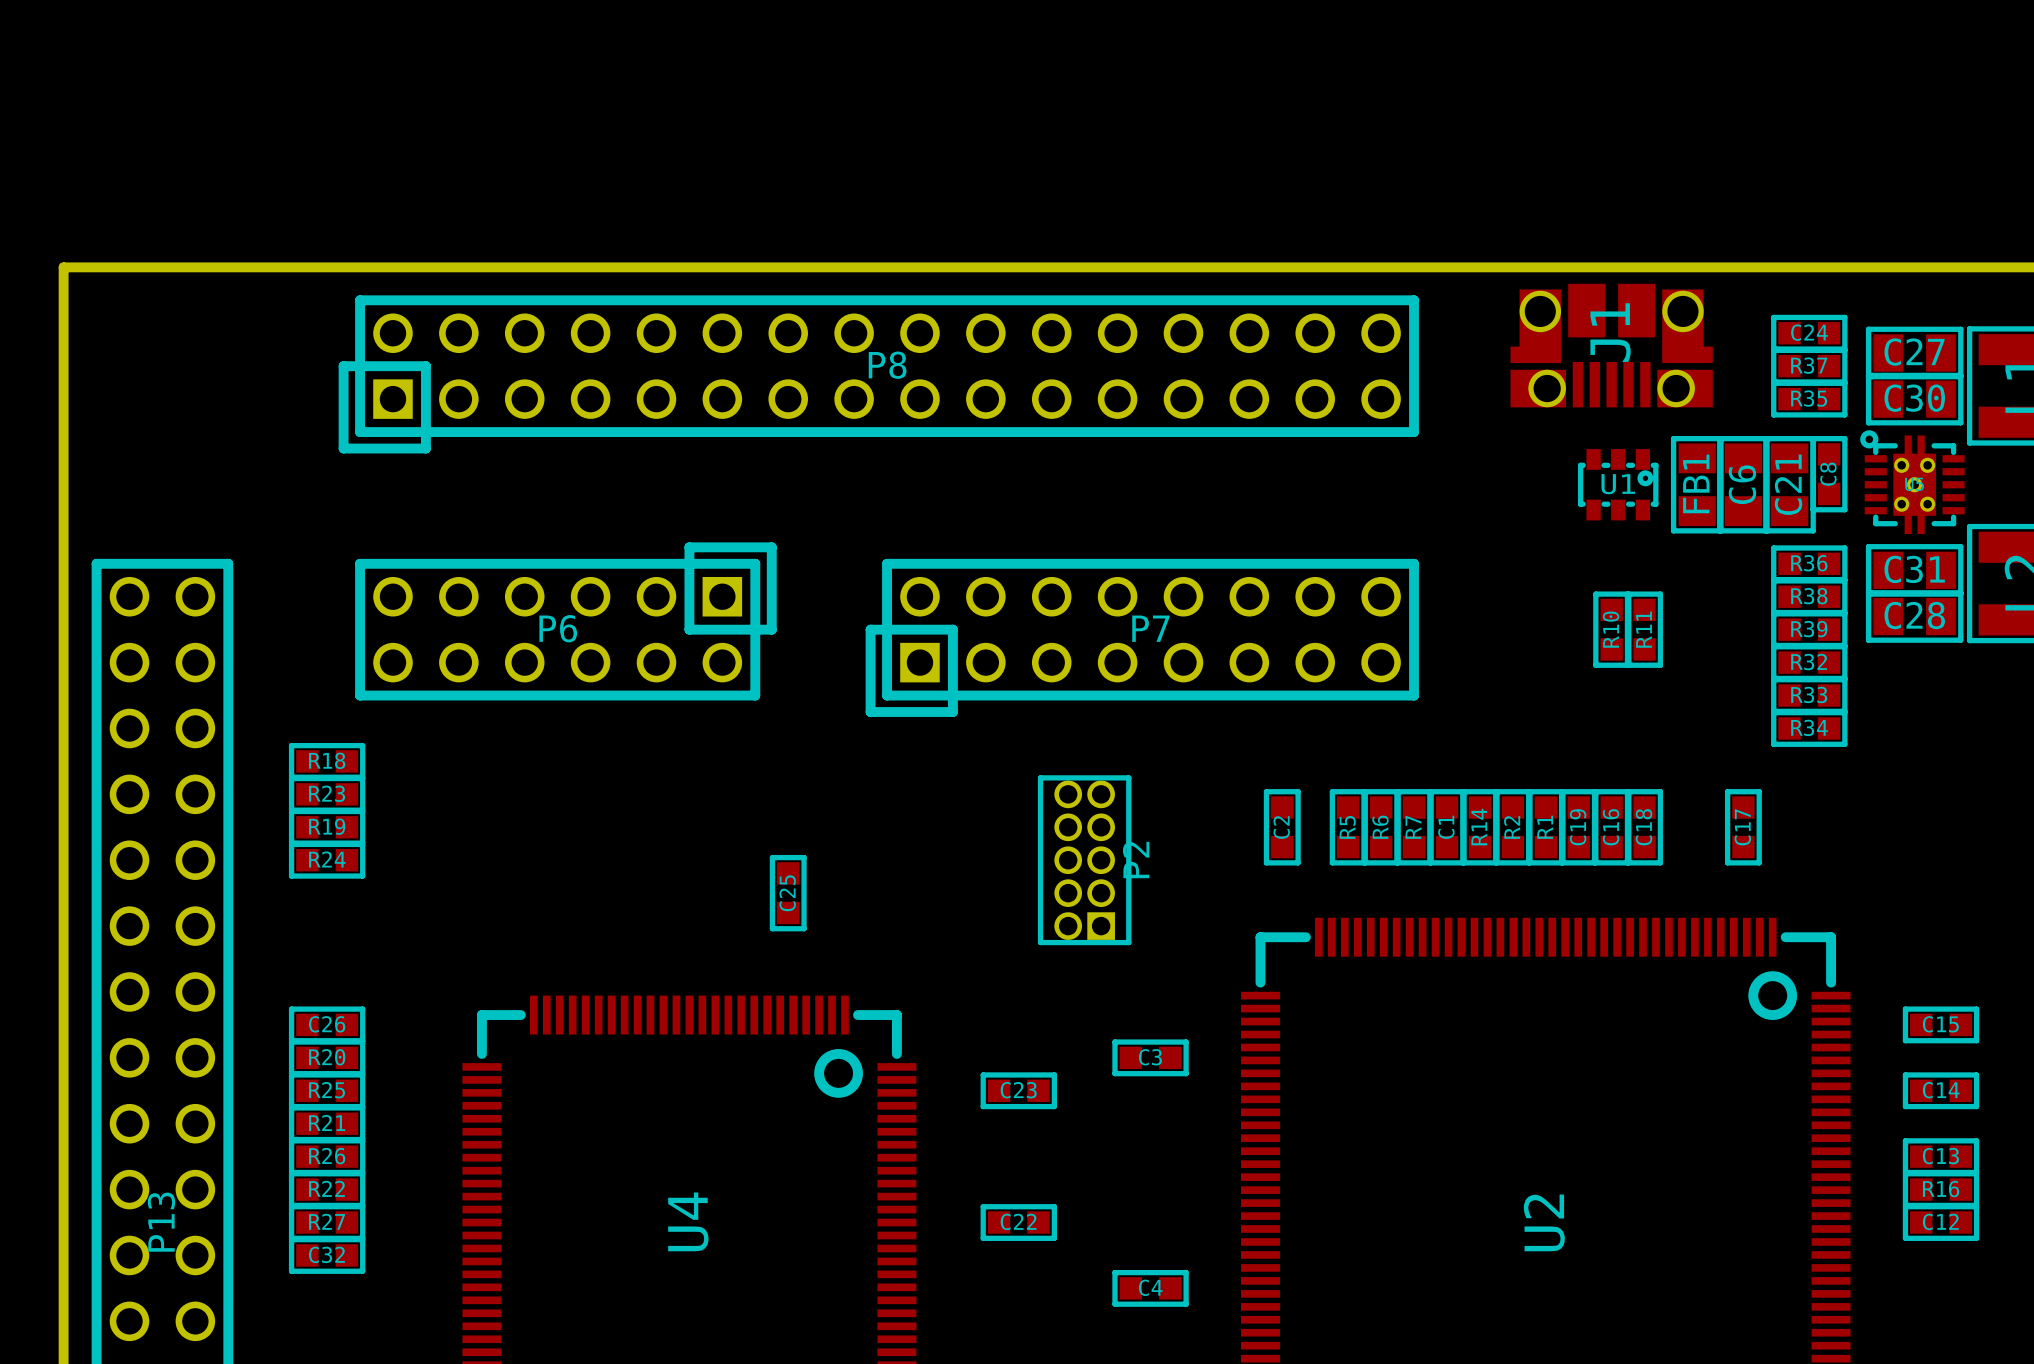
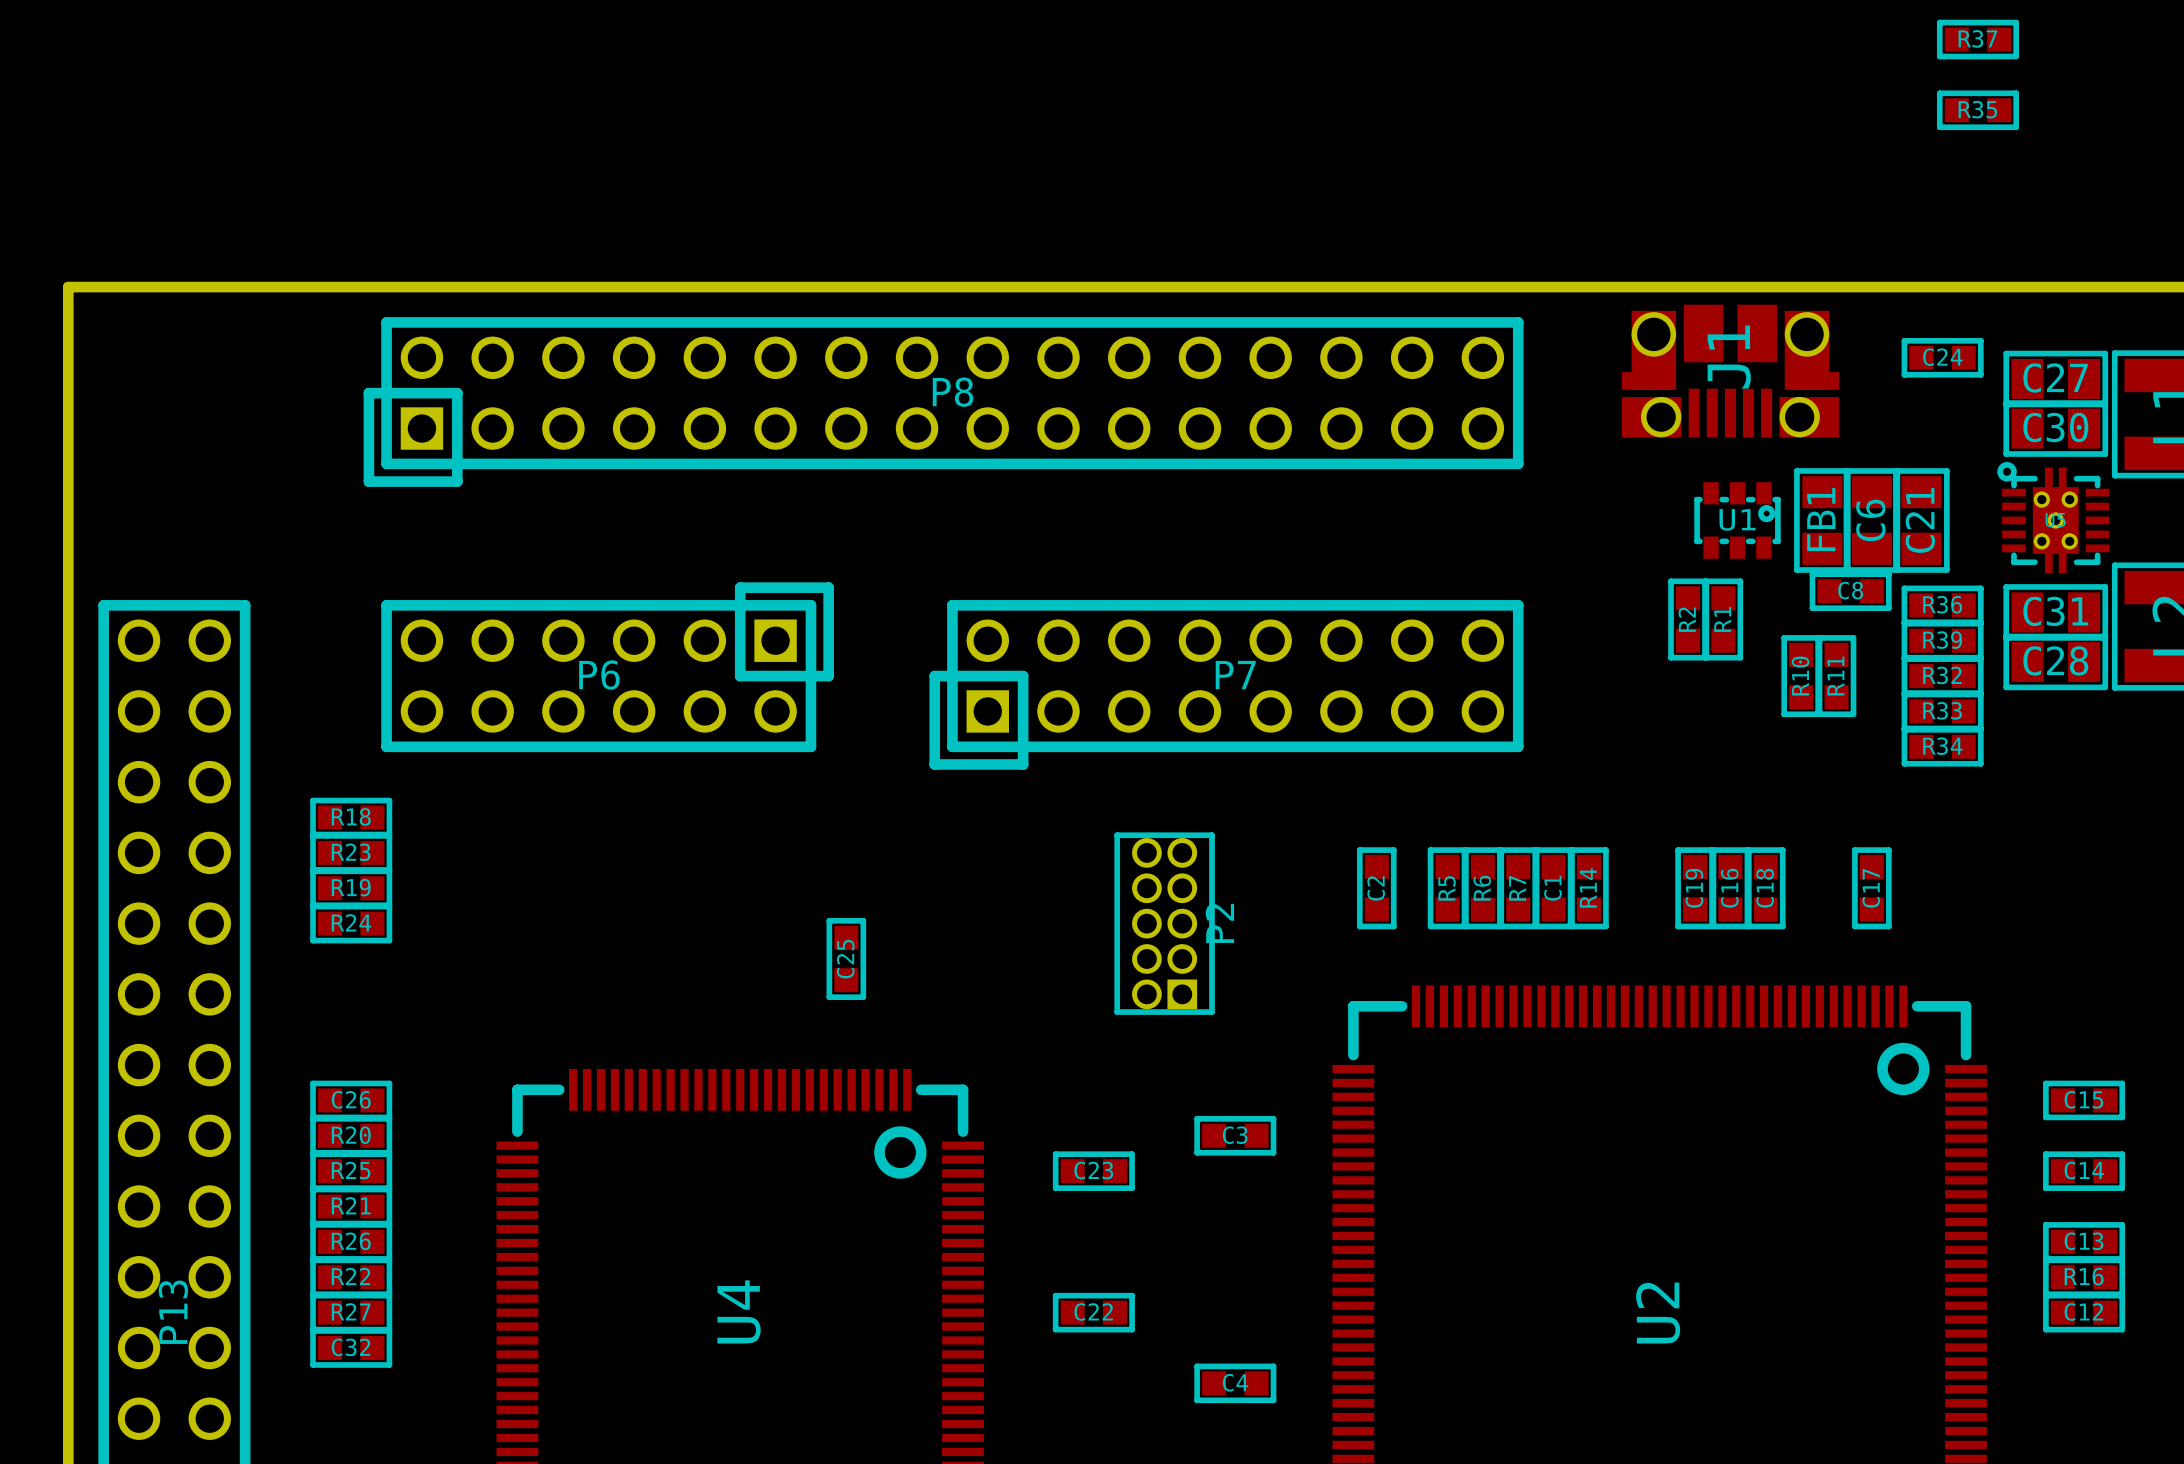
R37 position: (1809, 366) -> (1977, 39)
R35 position: (1809, 399) -> (1977, 110)
C8 rotation: 0° (1829, 474) -> 90° clockwise (1850, 591)
C8 position: (1829, 474) -> (1850, 591)
R38 name: R38 (1809, 596) -> R39 (1942, 640)
R10 position: (1611, 629) -> (1801, 676)
R11 position: (1644, 629) -> (1836, 676)
R39 name: R39 (1809, 629) -> R32 (1942, 675)
R32 name: R32 (1809, 662) -> R33 (1942, 710)
R33 name: R33 (1809, 694) -> R34 (1942, 746)
R34: (1809, 728) -> none
R2 position: (1512, 827) -> (1687, 619)
R1 position: (1545, 827) -> (1723, 619)

